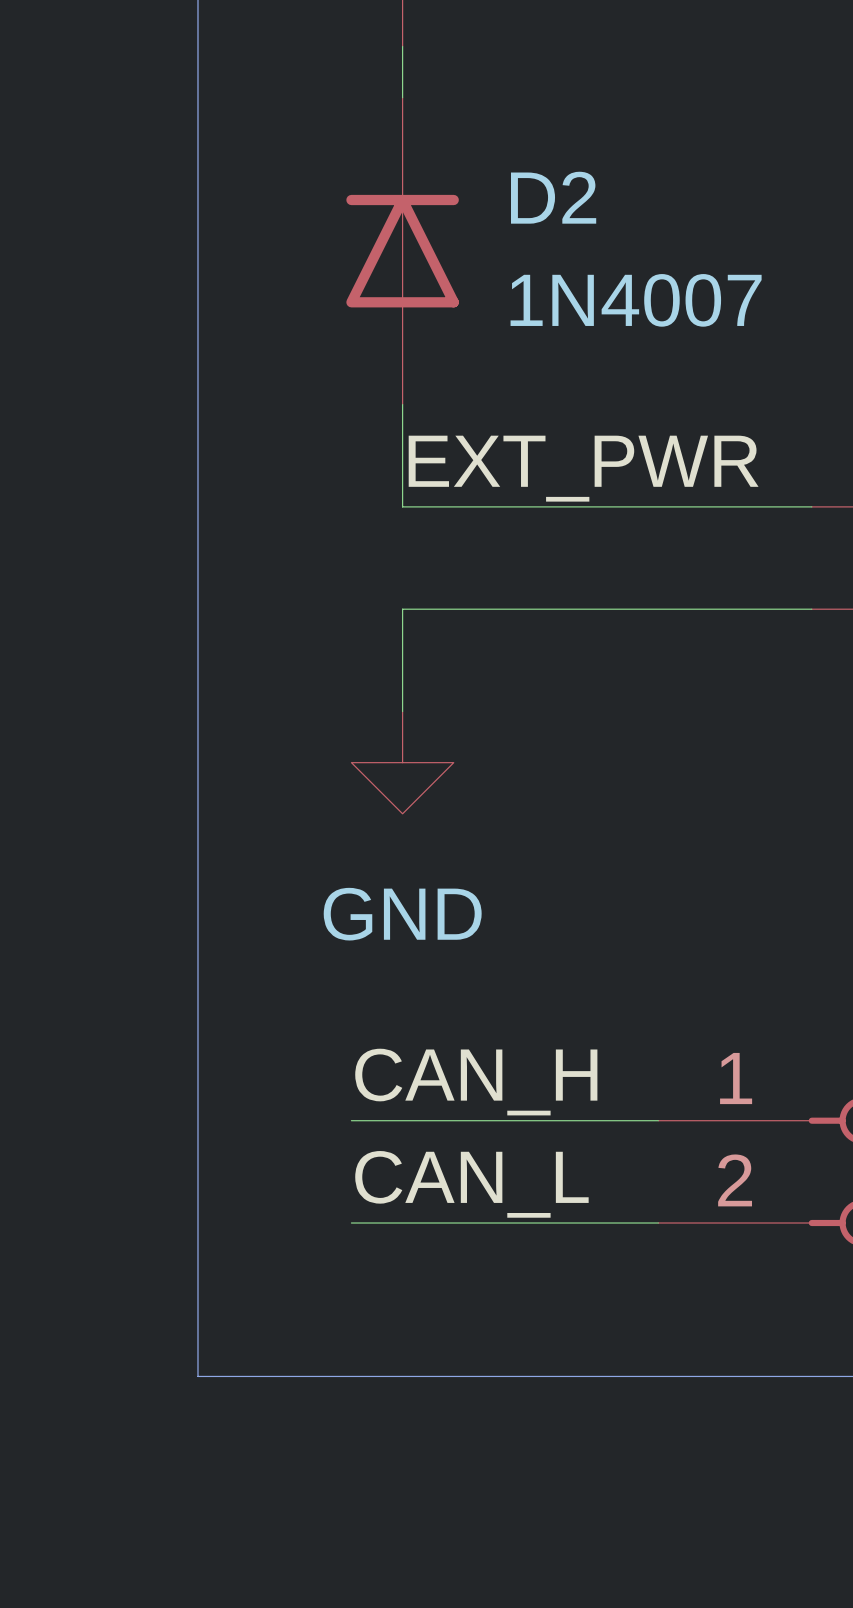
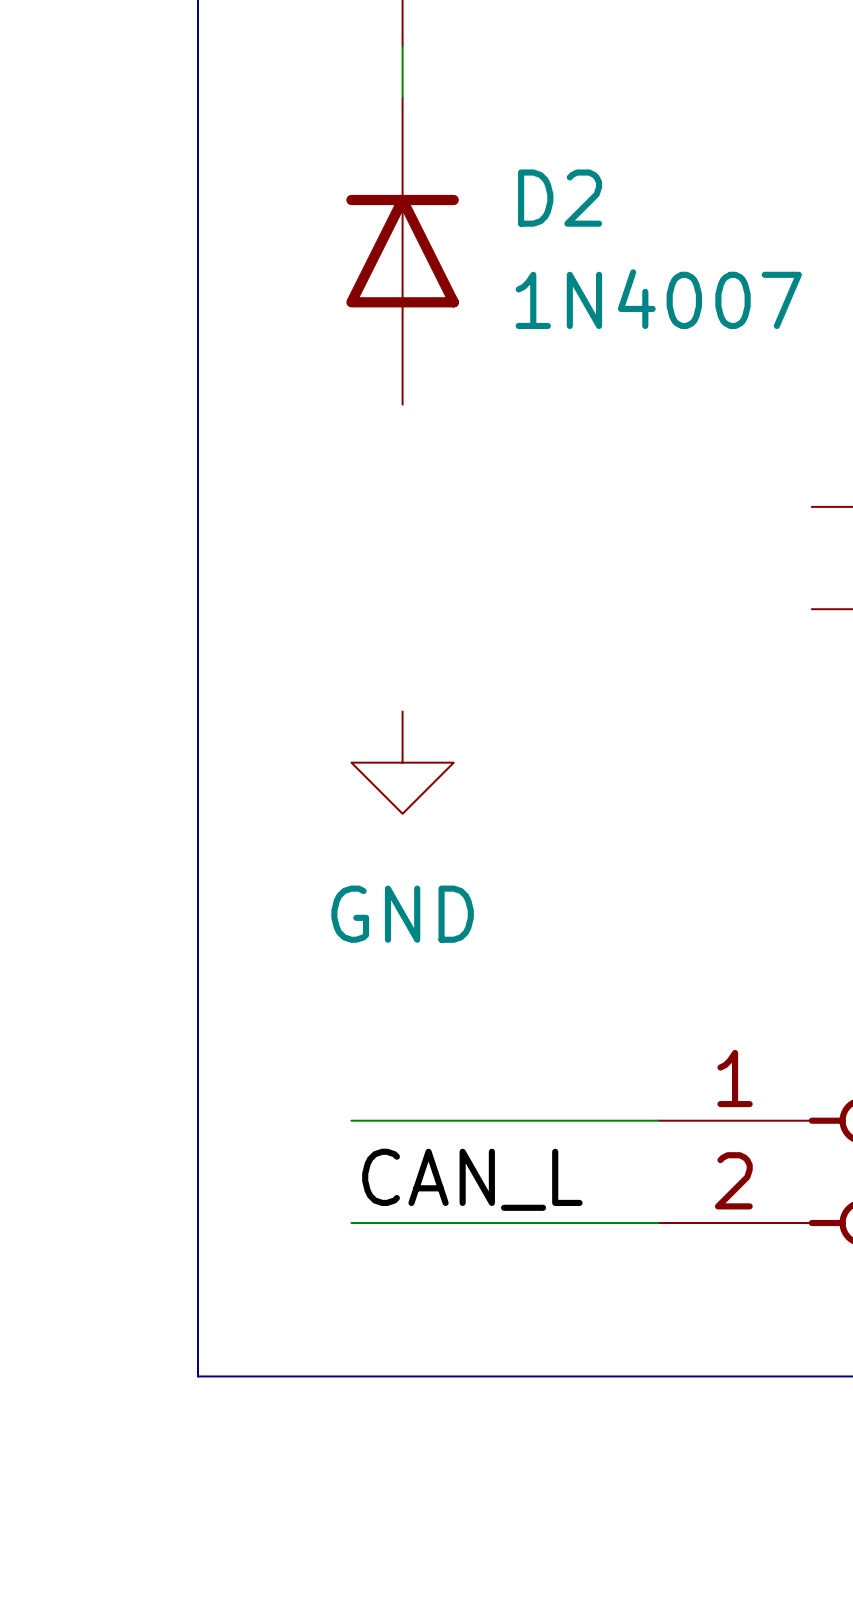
wire: (402, 404) (402, 506) (811, 506) -> none
label: EXT_PWR (583, 468) -> none
wire: (811, 609) (402, 609) (402, 711) -> none
label: CAN_H (476, 1082) -> none

